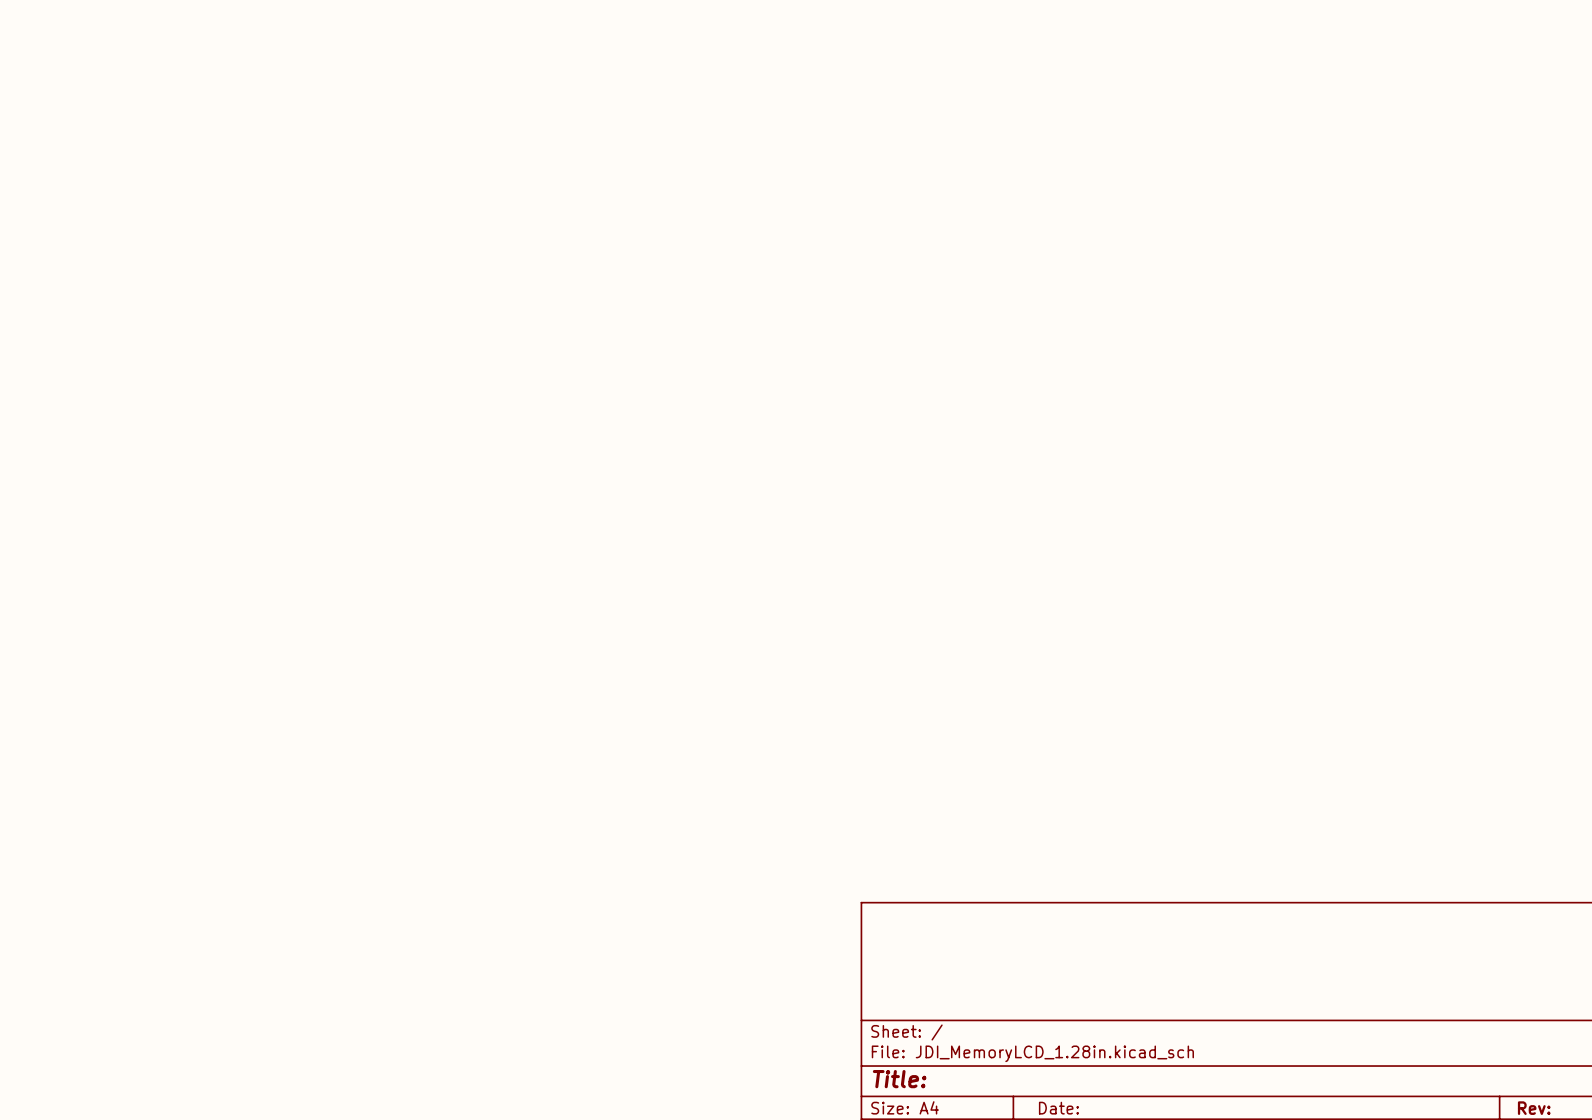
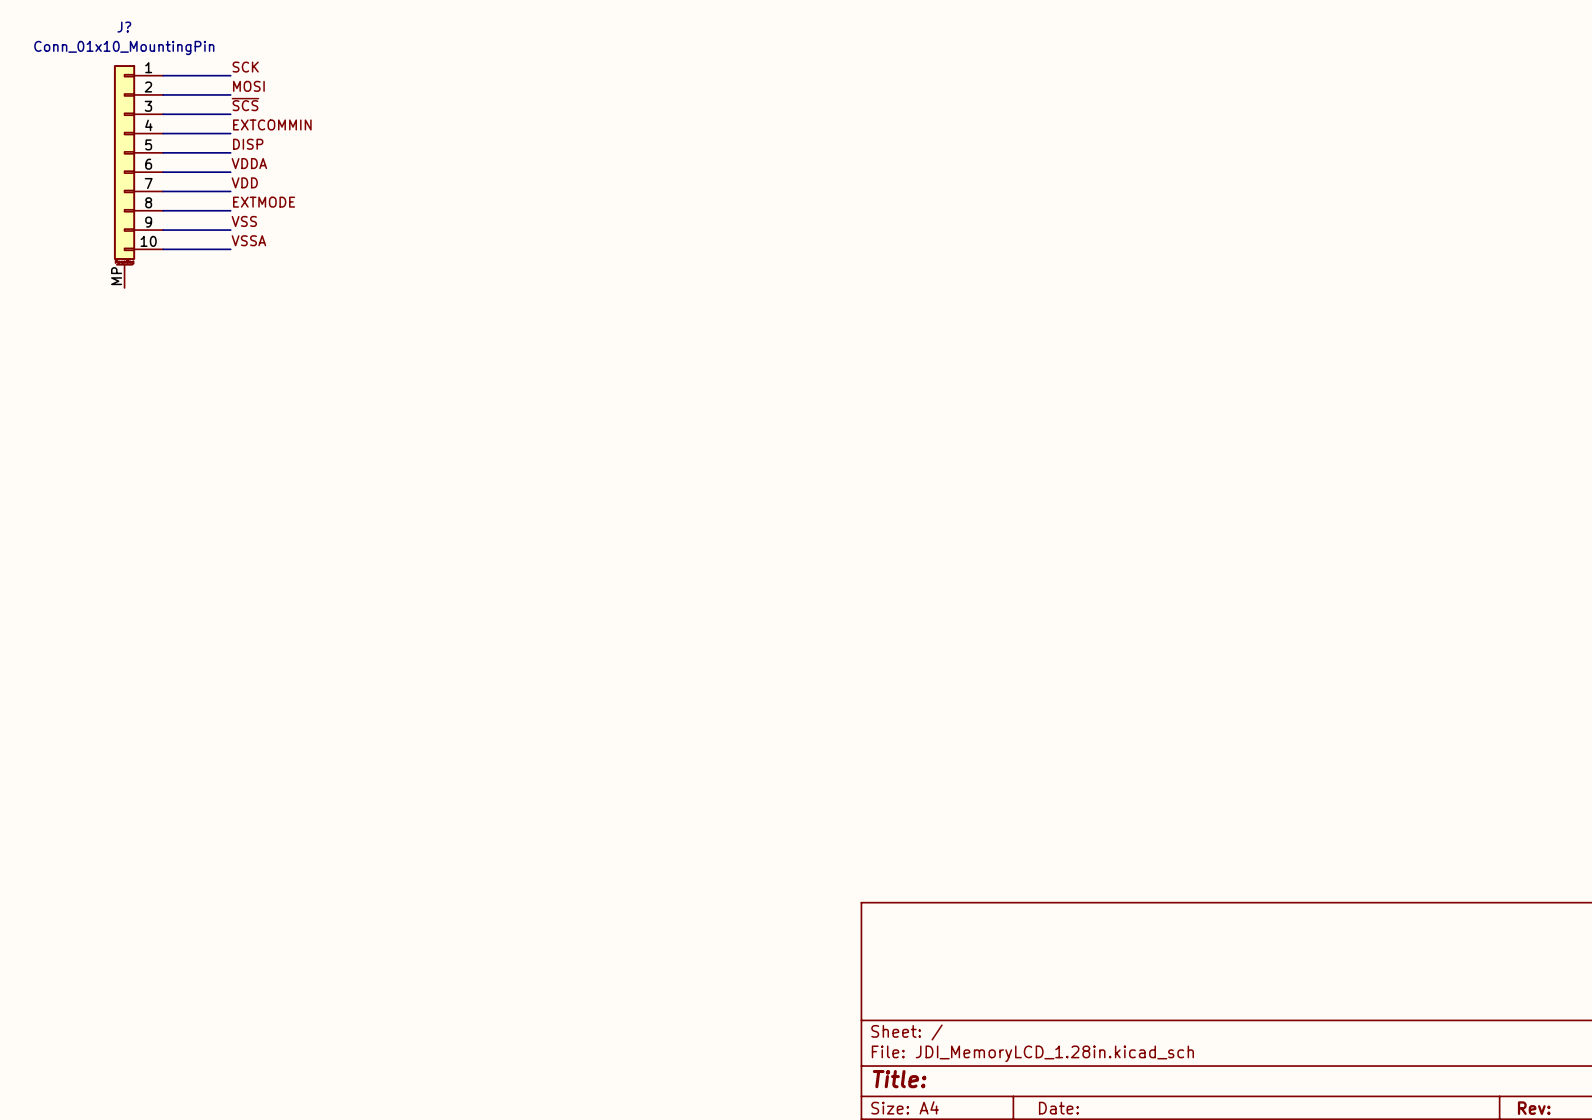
label: none -> SCK (245, 67)
wire: none -> (163, 75) (230, 75)
label: none -> MOSI (248, 86)
wire: none -> (163, 94) (230, 94)
label: none -> ~{SCS} (245, 104)
wire: none -> (163, 114) (230, 114)
label: none -> EXTCOMMIN (272, 124)
wire: none -> (163, 133) (230, 133)
label: none -> DISP (248, 144)
wire: none -> (163, 152) (230, 152)
label: none -> VDDA (249, 163)
wire: none -> (163, 172) (230, 172)
J?: none -> Conn_01x10_MountingPin (138, 176)
label: none -> VDD (244, 182)
wire: none -> (163, 191) (230, 191)
label: none -> EXTMODE (264, 202)
wire: none -> (163, 210) (230, 210)
label: none -> VSS (244, 221)
wire: none -> (163, 230) (230, 230)
label: none -> VSSA (248, 240)
wire: none -> (163, 249) (230, 249)

